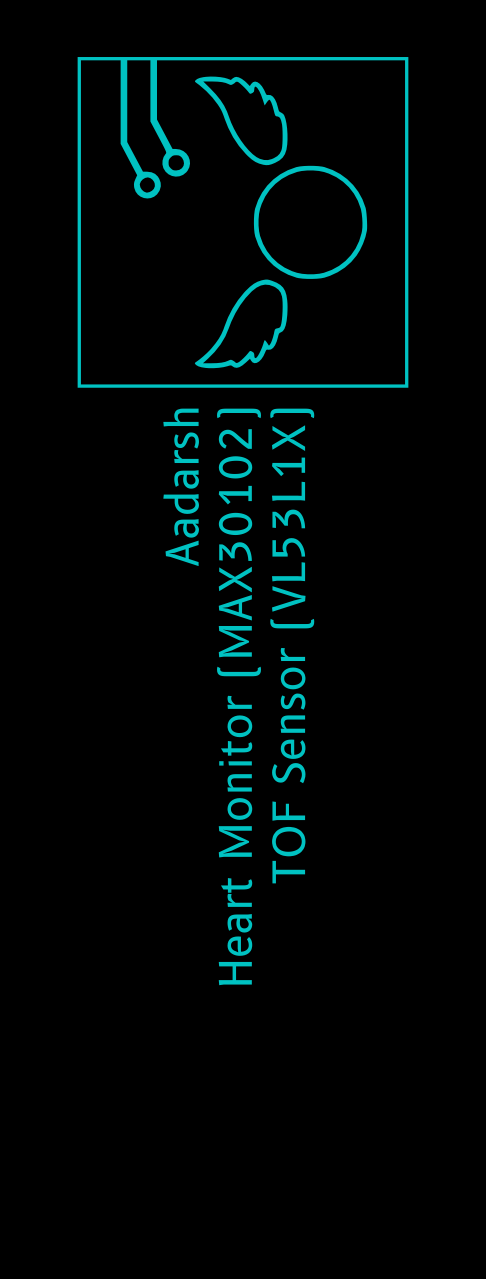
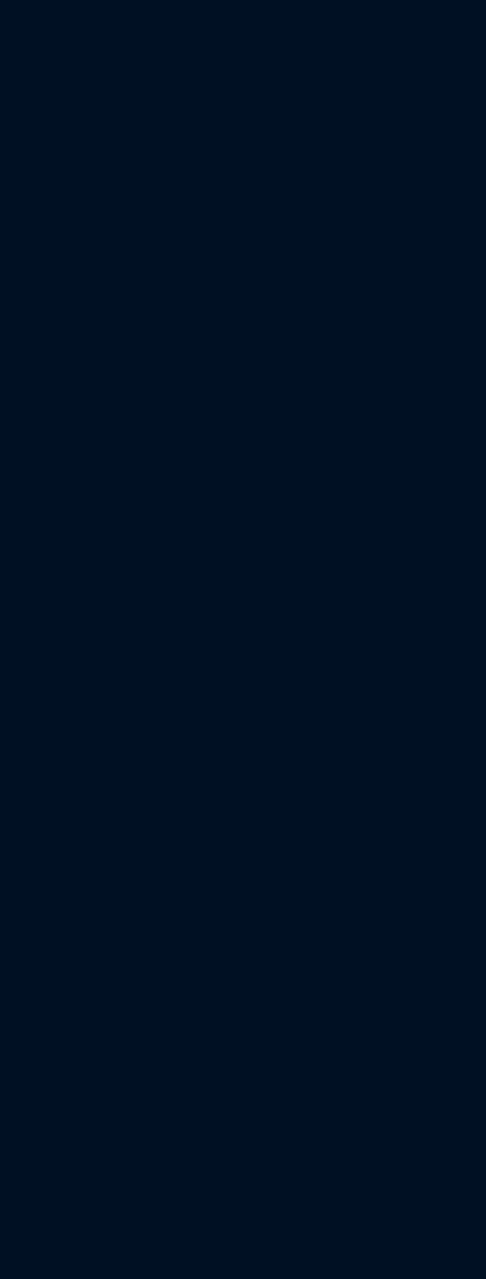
drawing: [77, 57, 409, 388] -> none
text: Aadarsh (181, 487) -> none
text: TOF Sensor (VL53L1X) (292, 646) -> none
text: Heart Monitor (MAX30102) (239, 696) -> none

